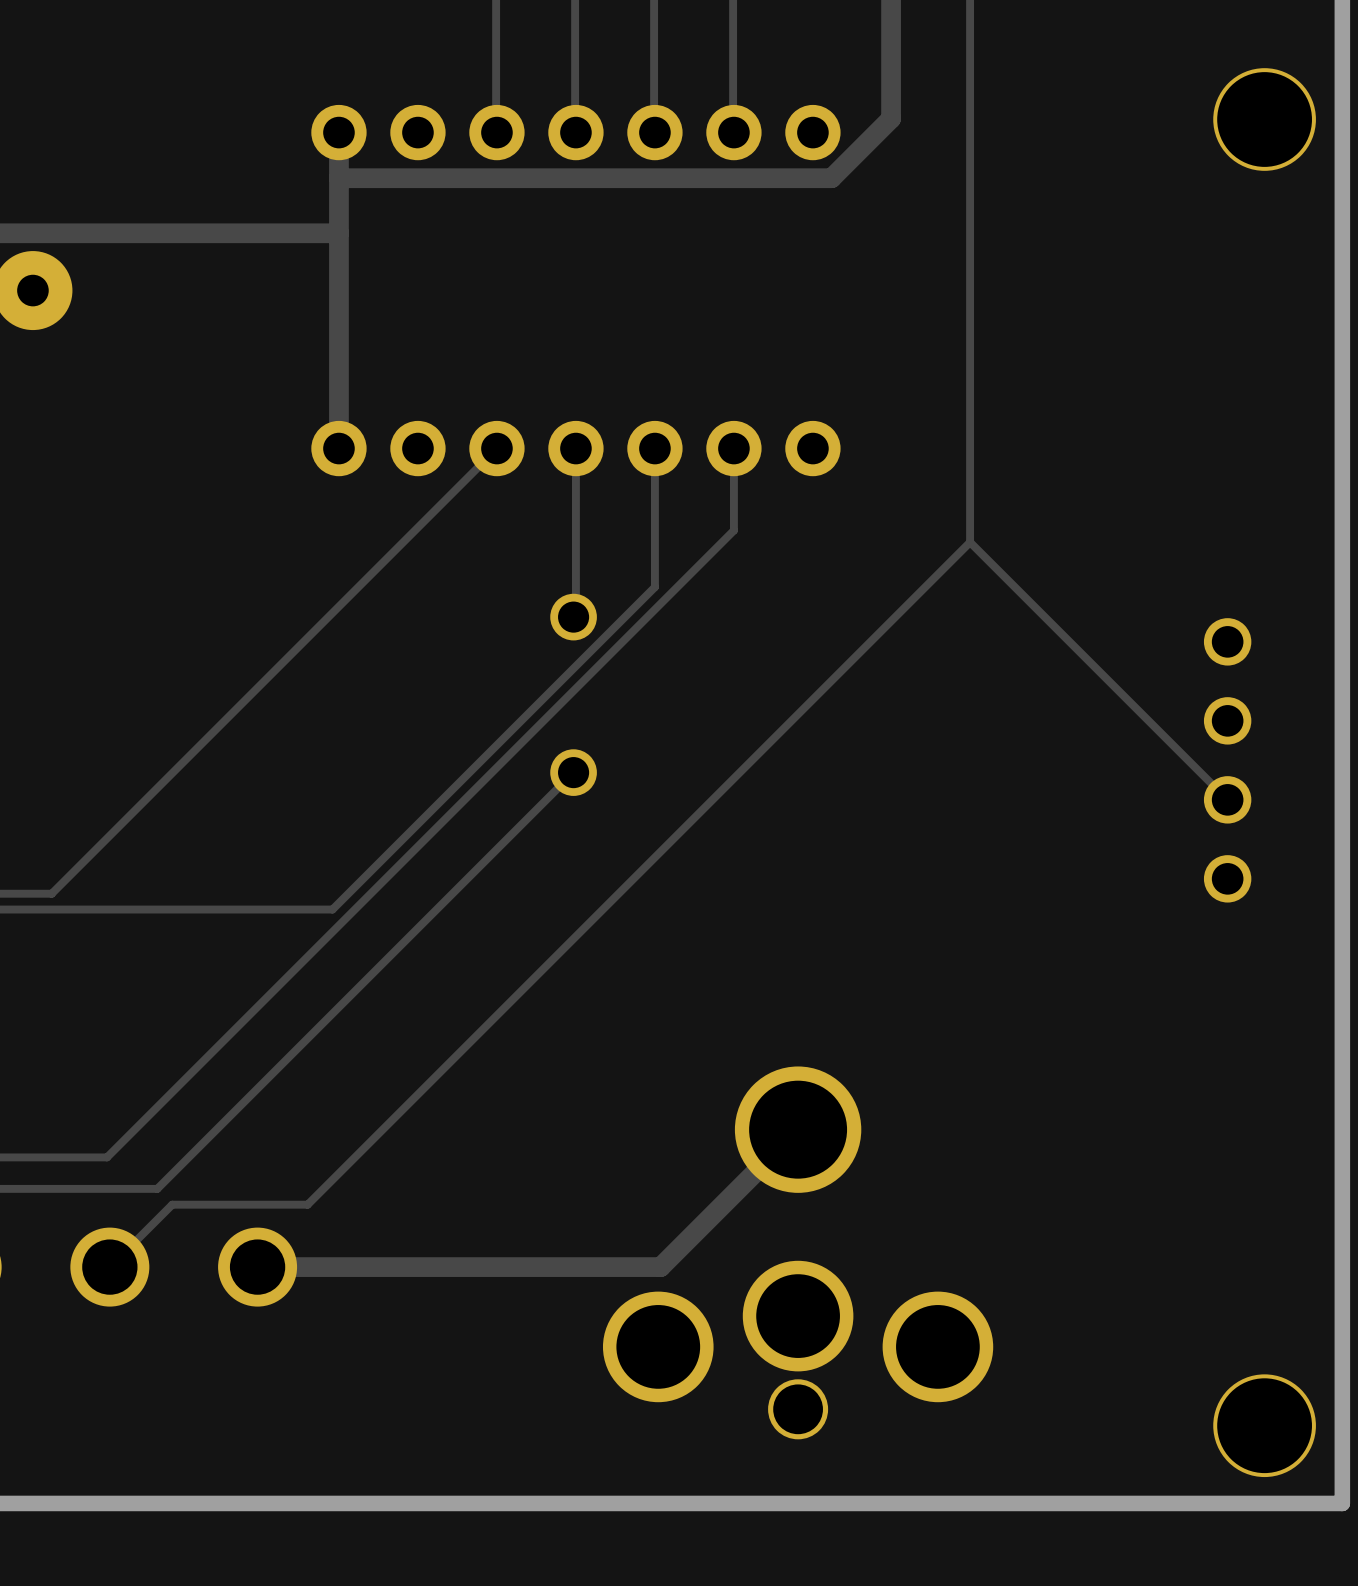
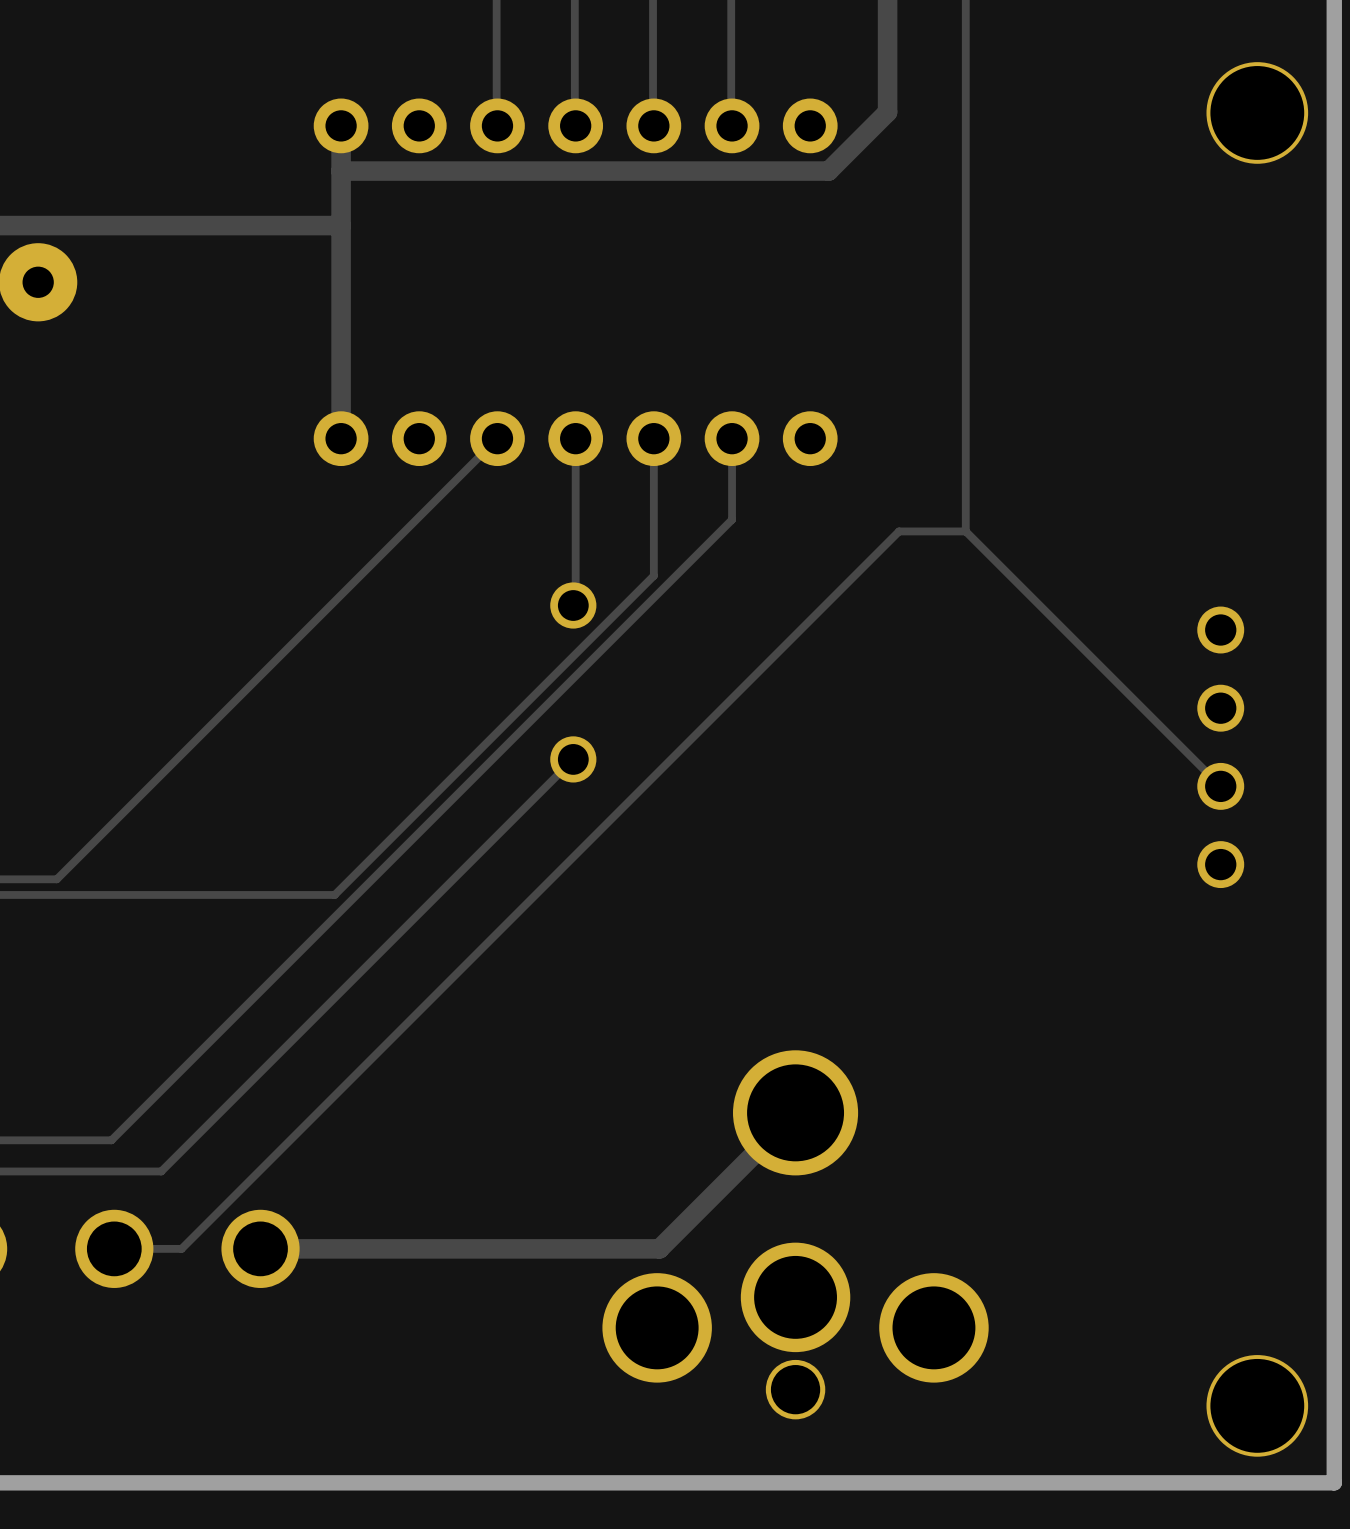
track: (970, 542) (307, 1204) (172, 1204) (109, 1267) -> (965, 531) (899, 531) (181, 1248) (114, 1248)

